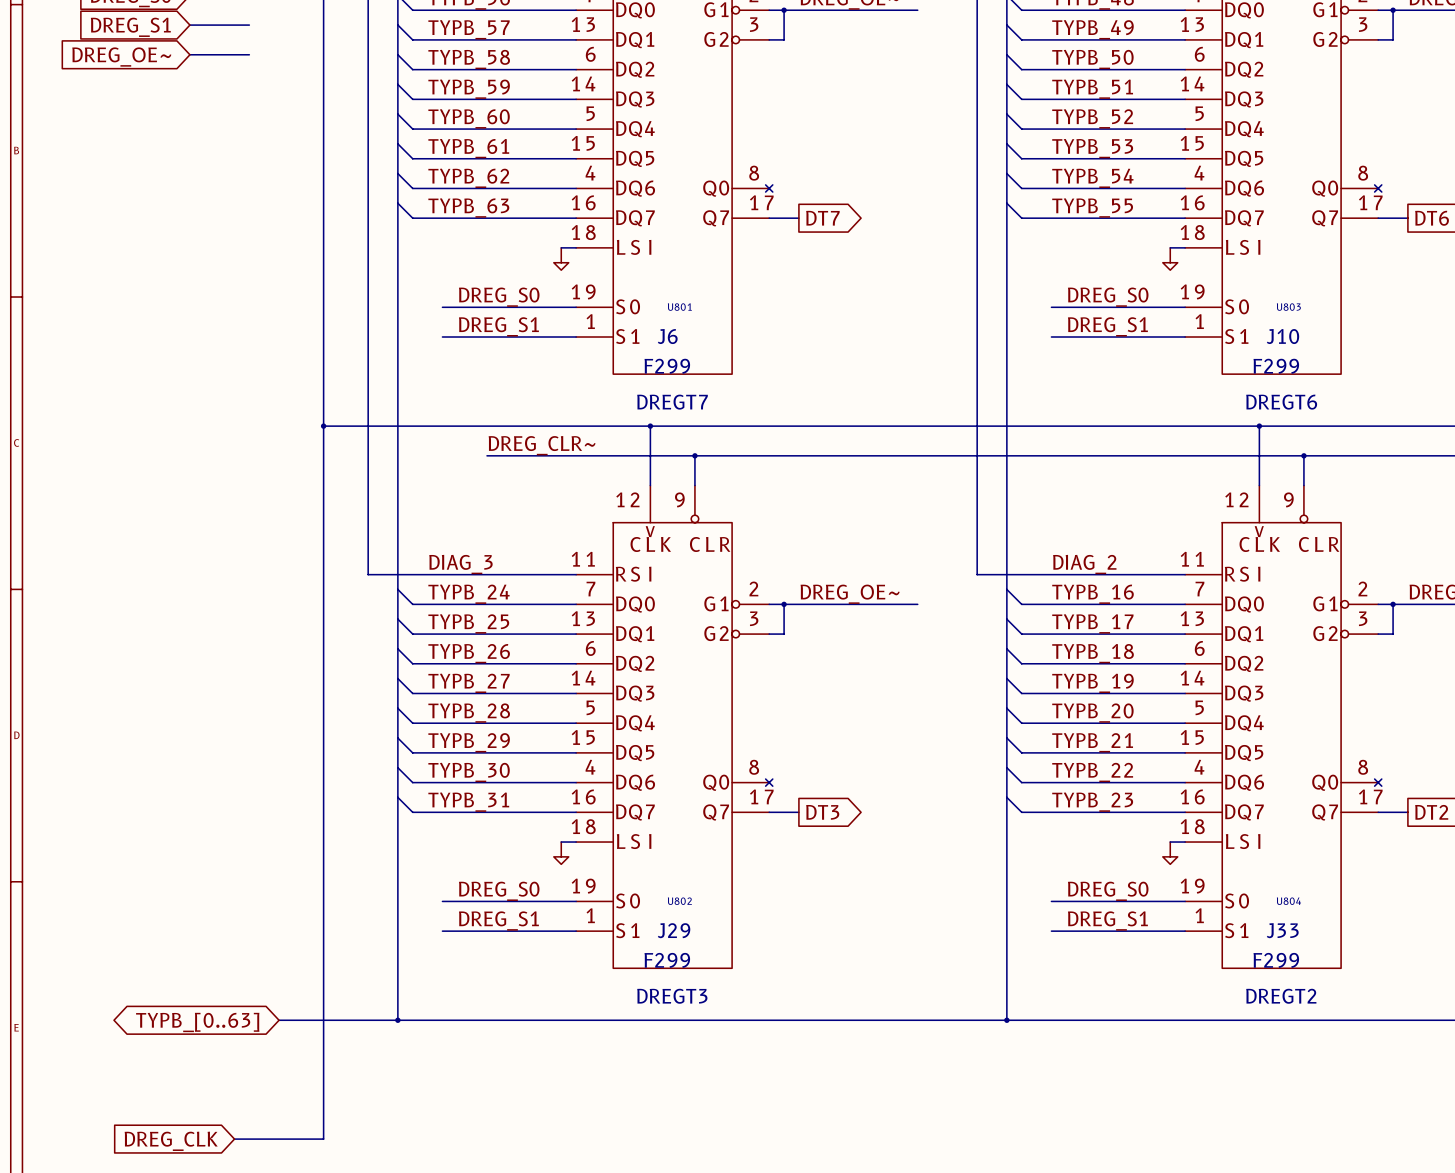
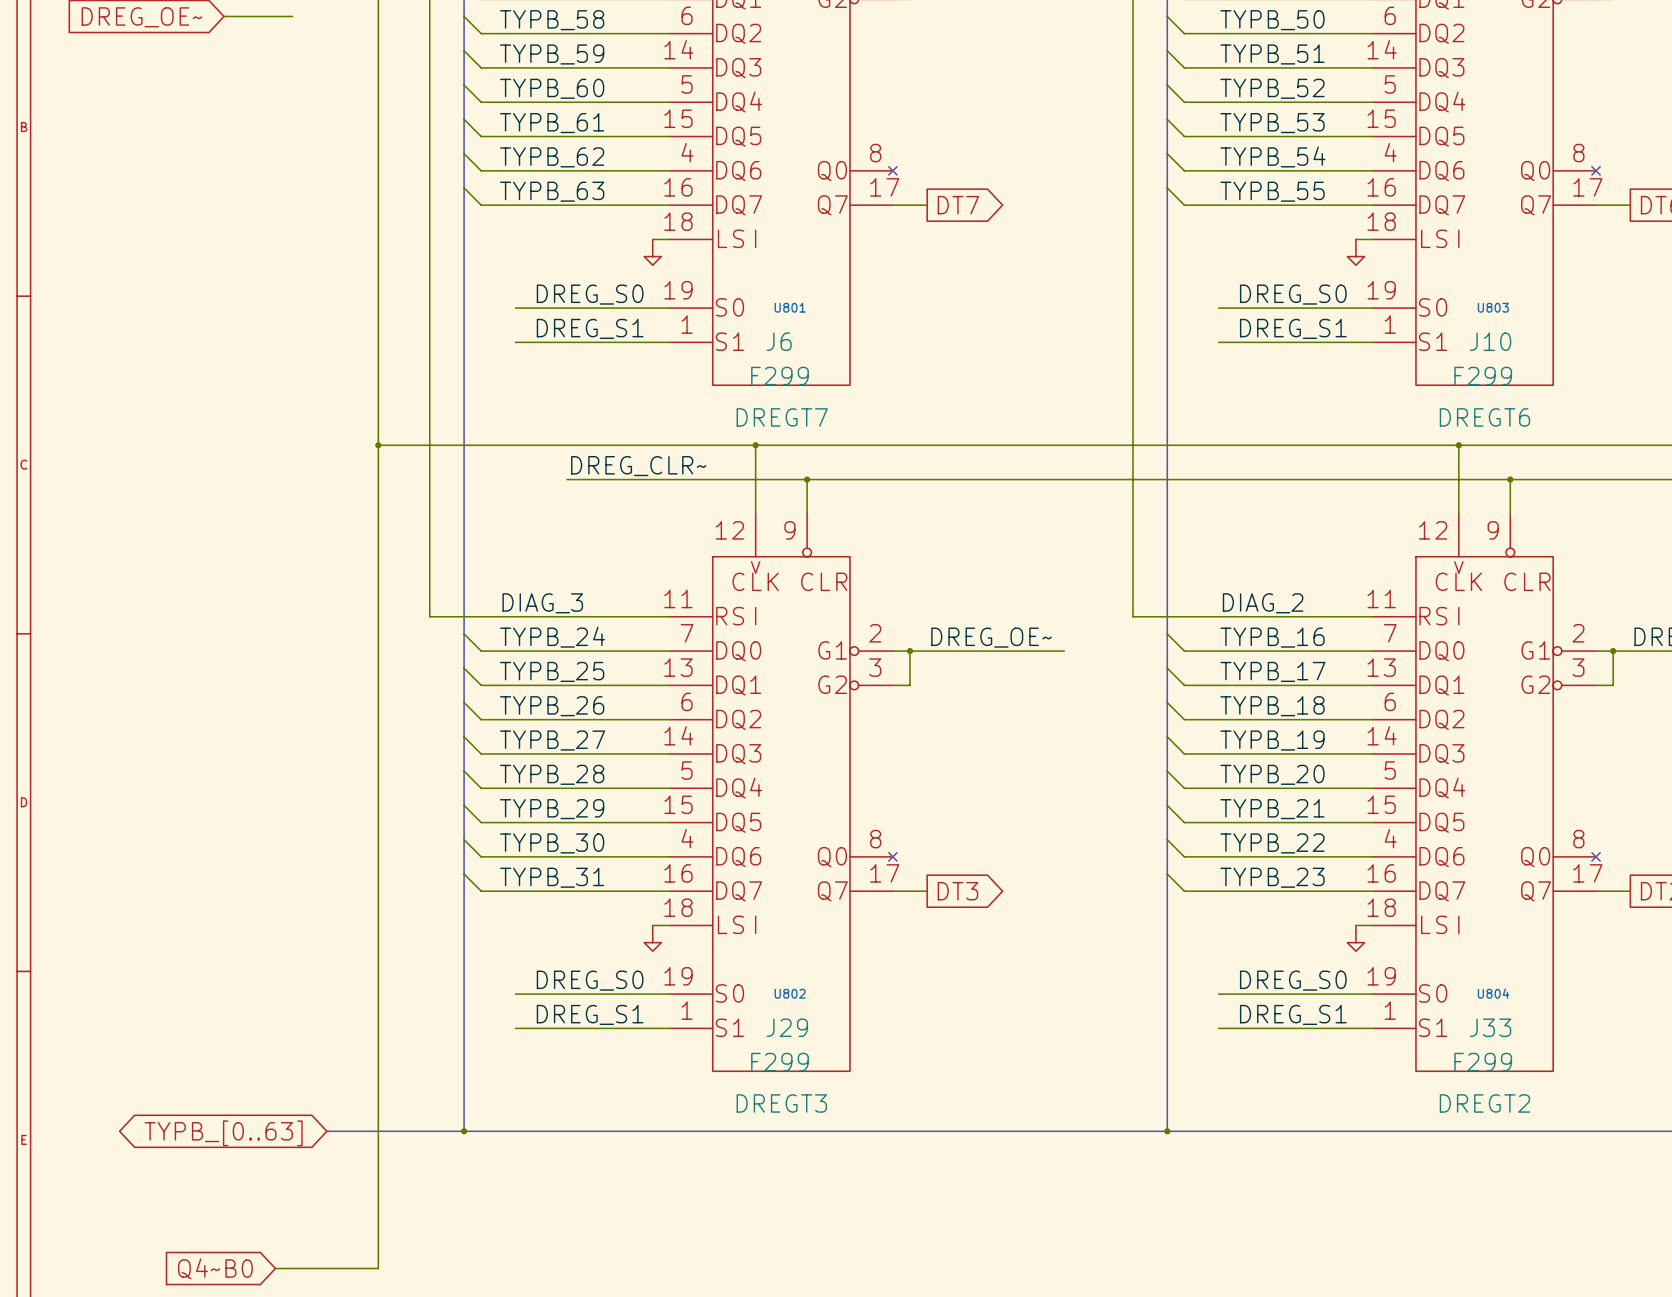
global label: DREG_CLK (171, 1141) -> Q4~B0 (215, 1268)

